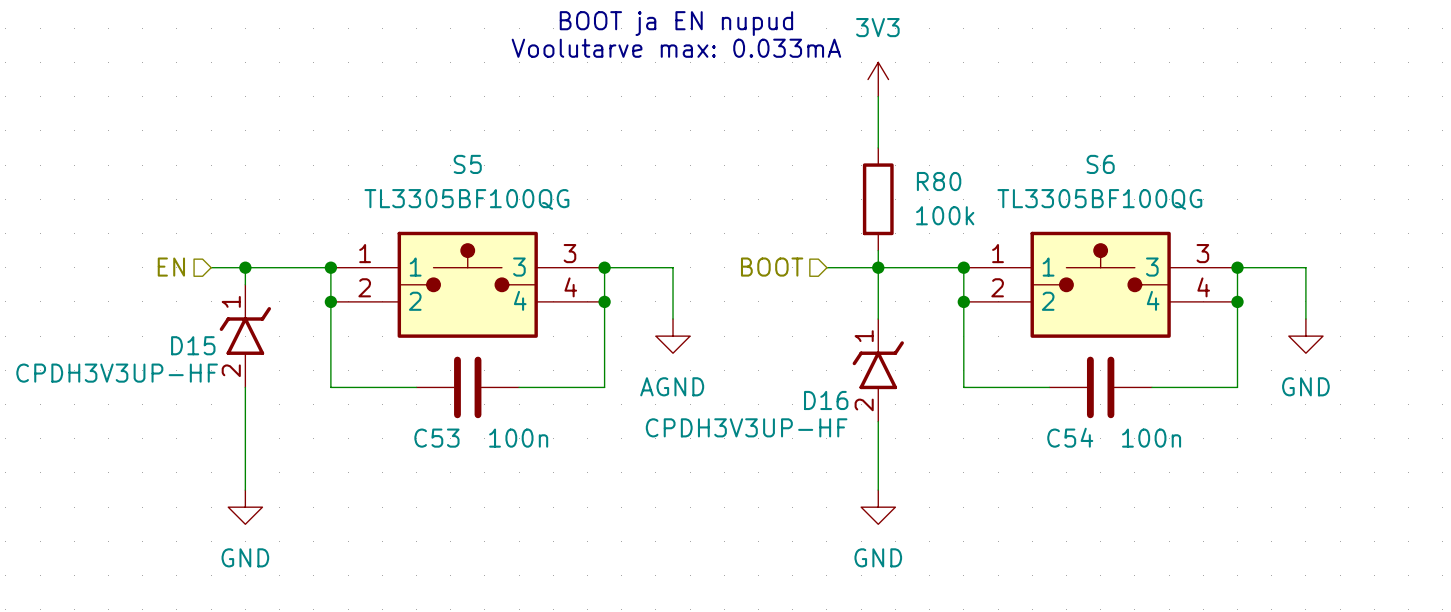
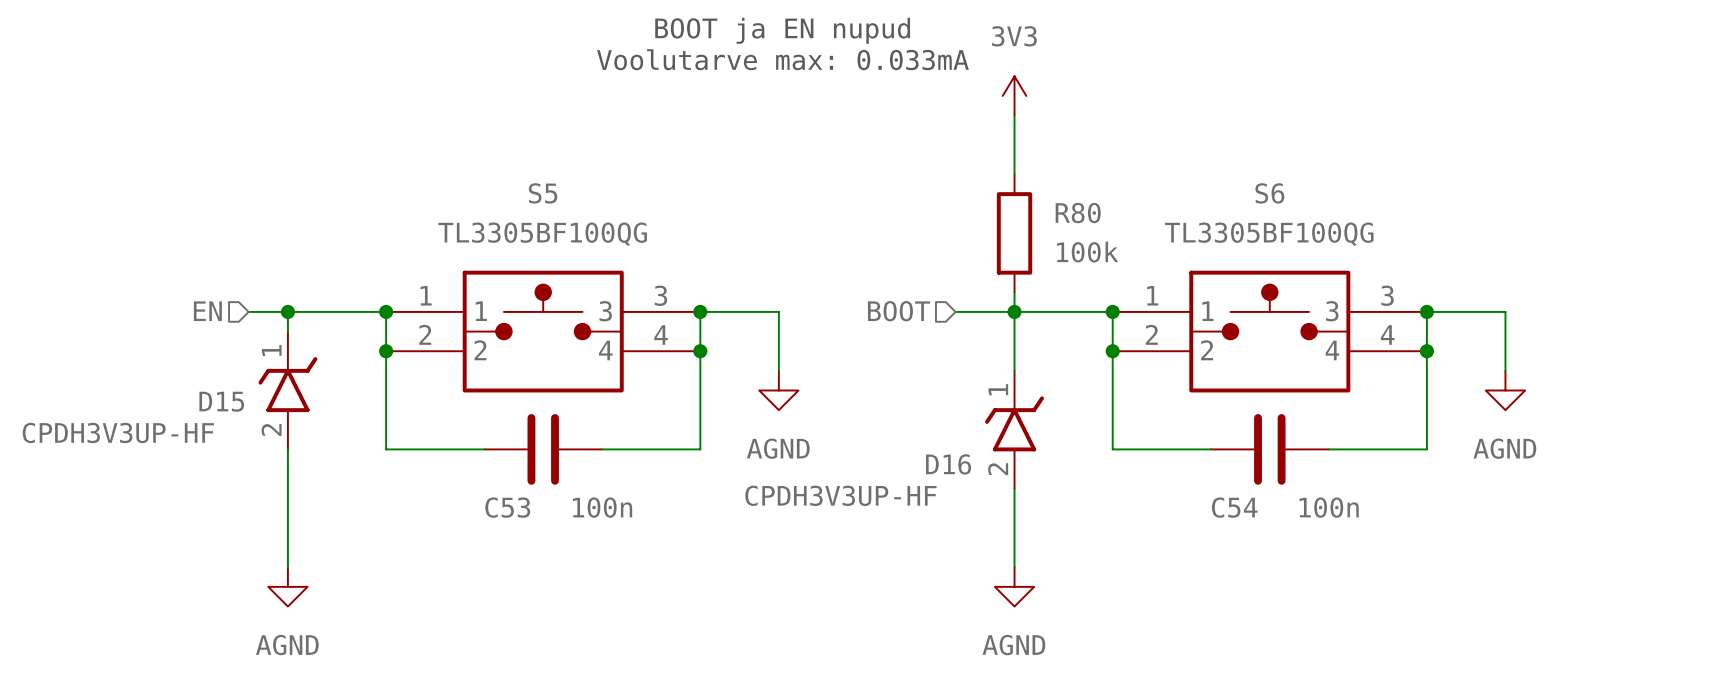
power symbol: GND (1305, 336) -> AGND (1505, 390)
power symbol: GND (245, 507) -> AGND (287, 586)
power symbol: GND (878, 507) -> AGND (1014, 586)

